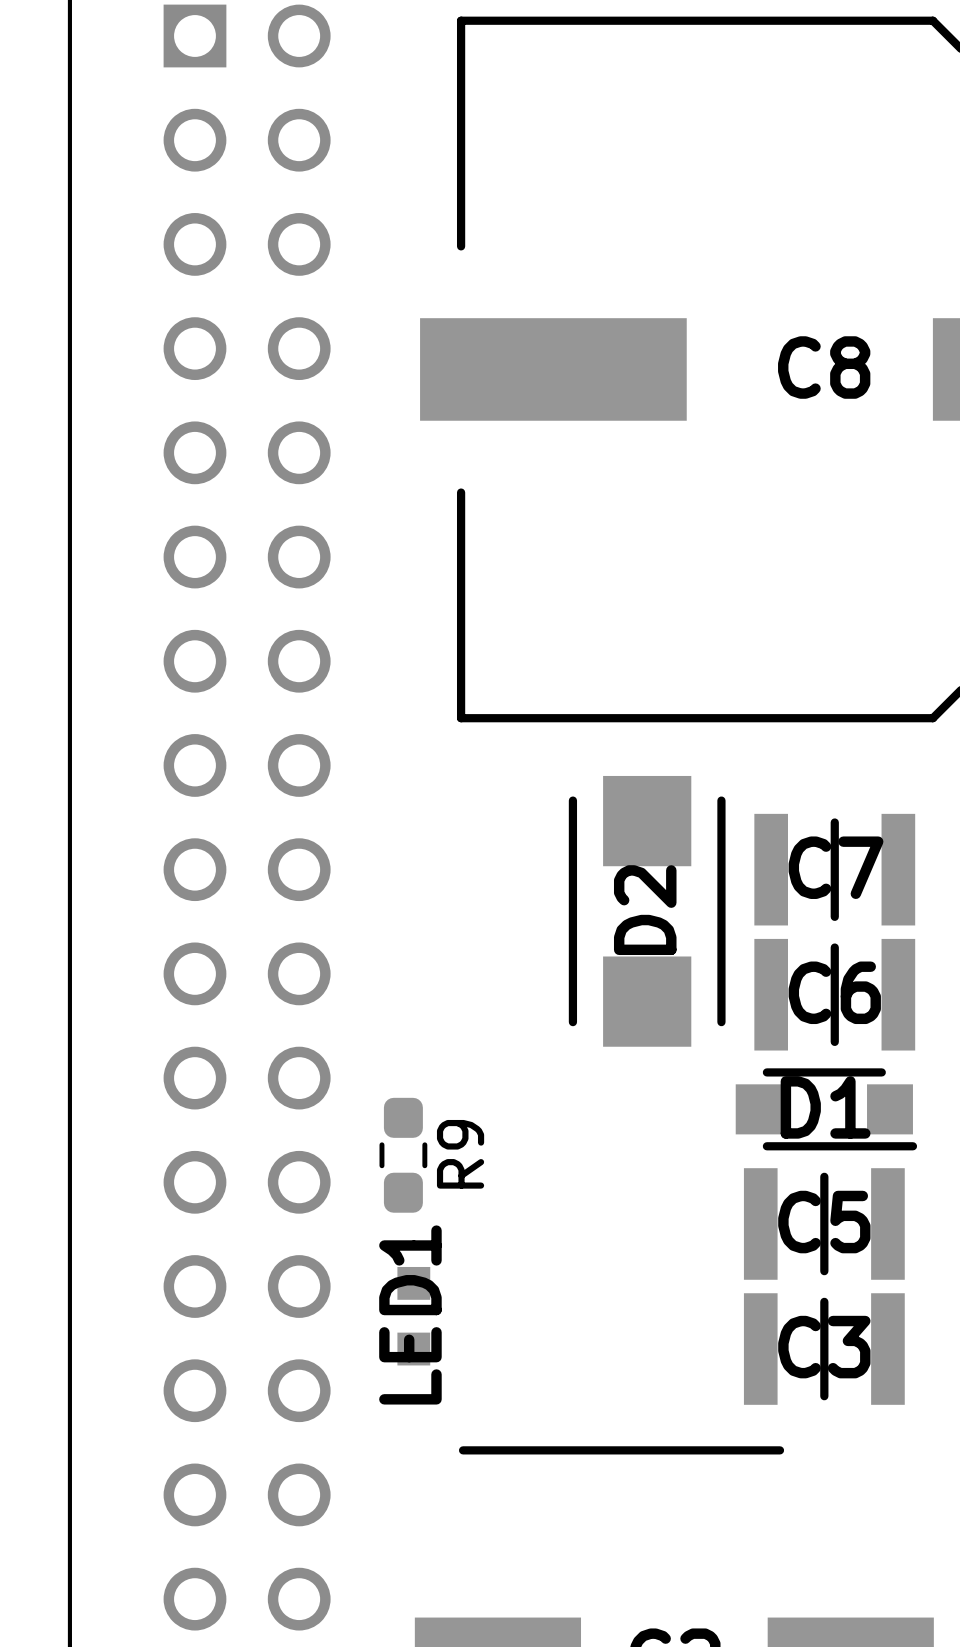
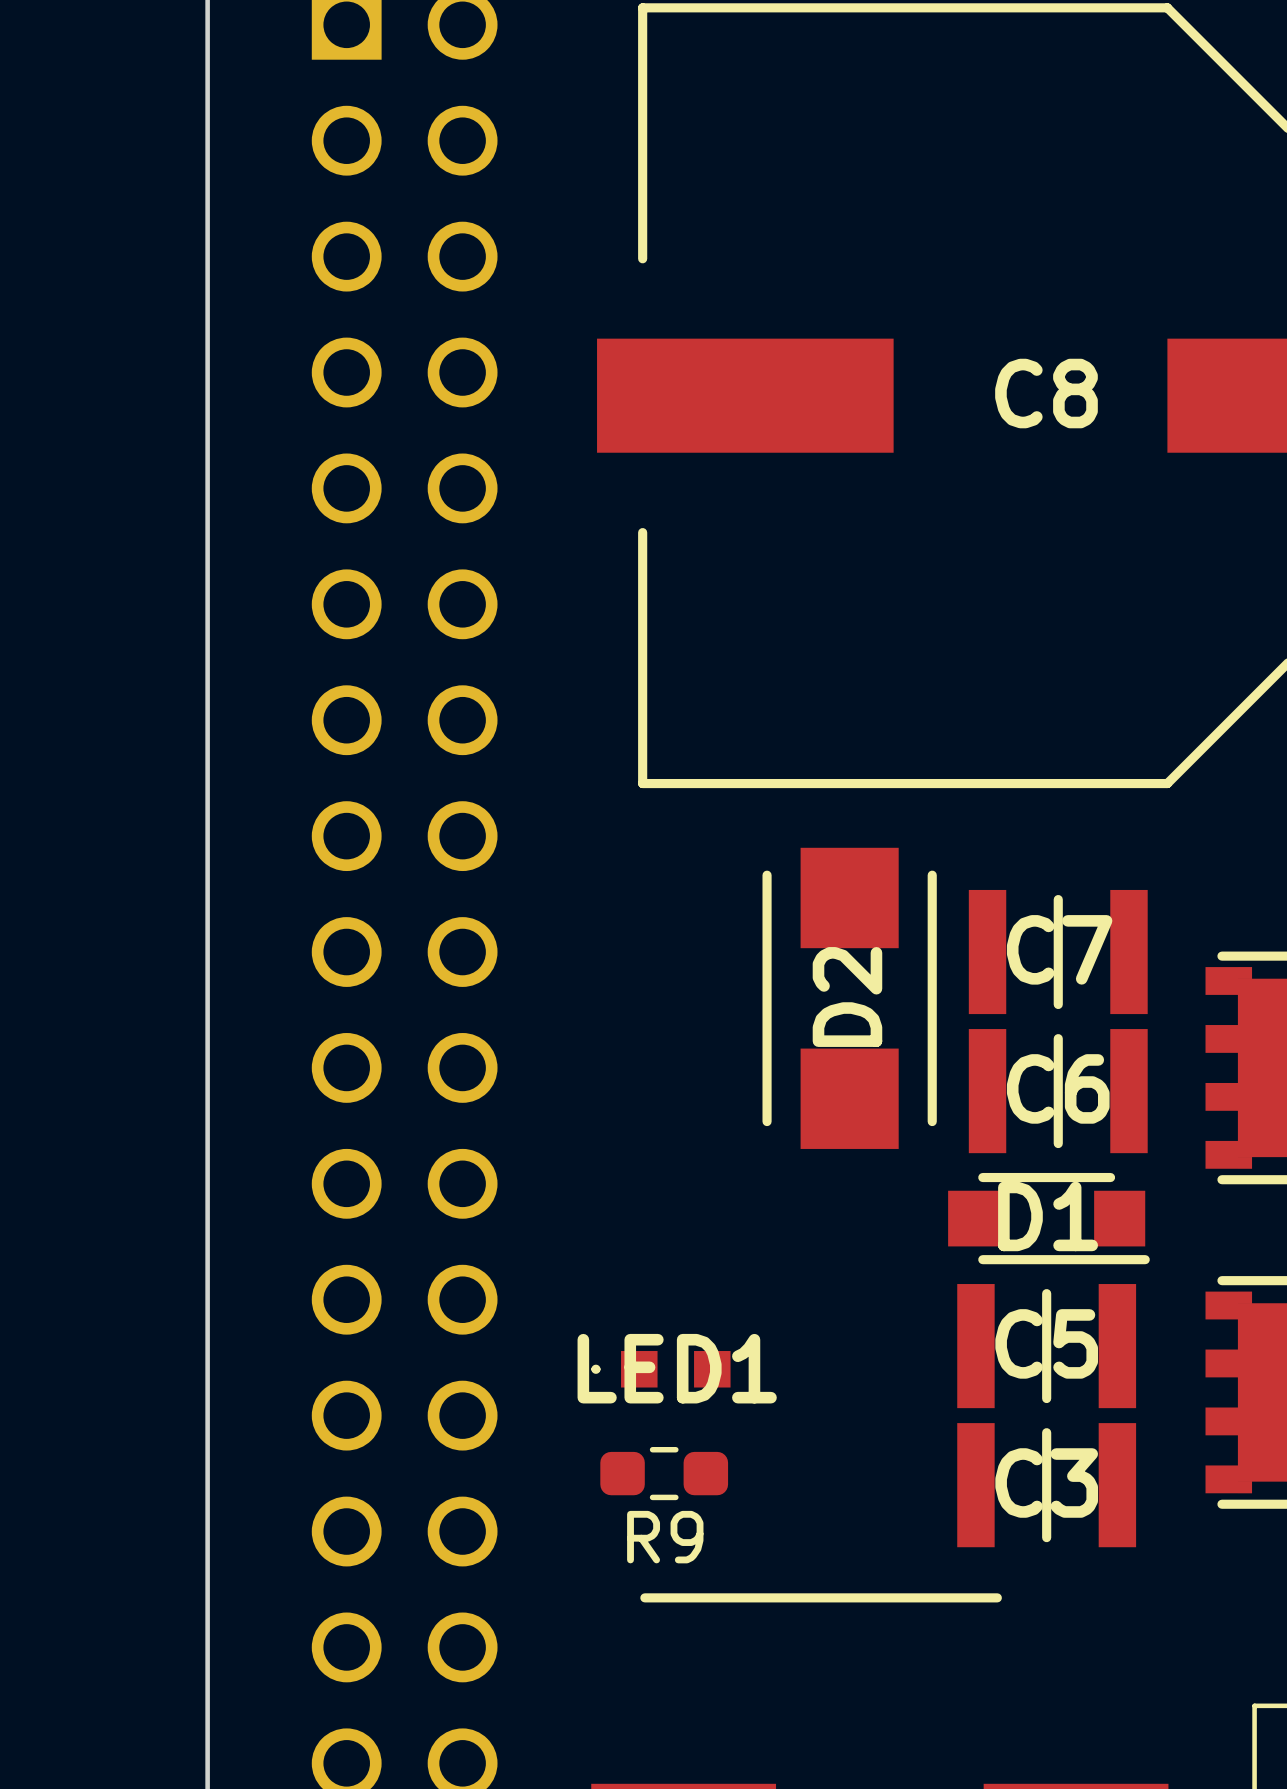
R9 rotation: 0° (403, 1155) -> 90° clockwise (664, 1473)
R9 position: (403, 1155) -> (664, 1473)
LED1 rotation: 0° (413, 1302) -> 90° counterclockwise (660, 1369)
LED1 position: (413, 1302) -> (660, 1369)

